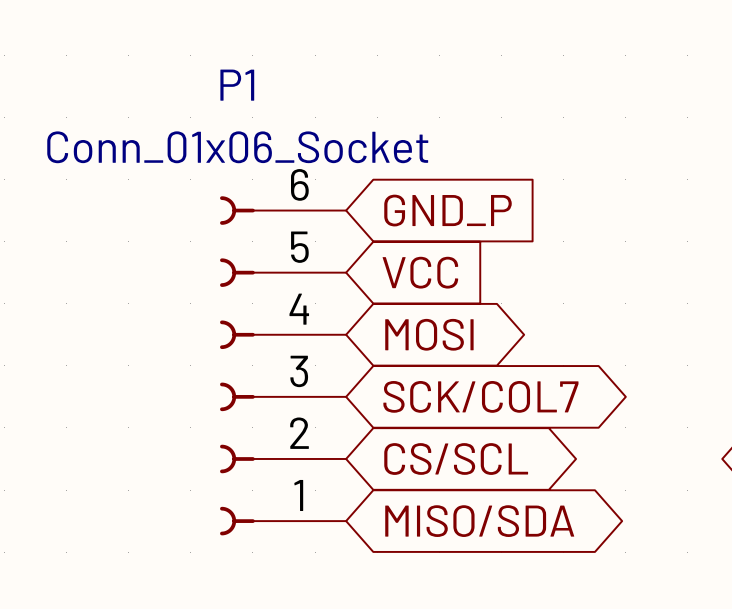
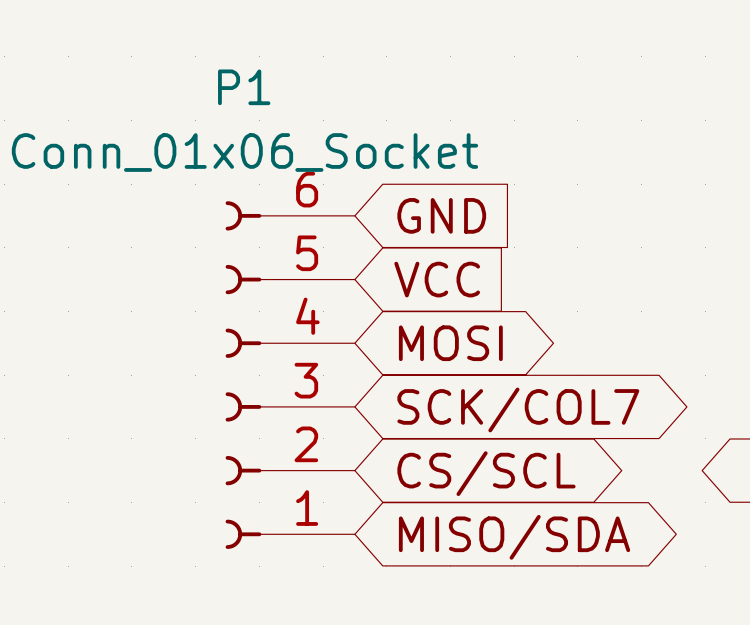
global label: GND_P (448, 210) -> GND (441, 215)

